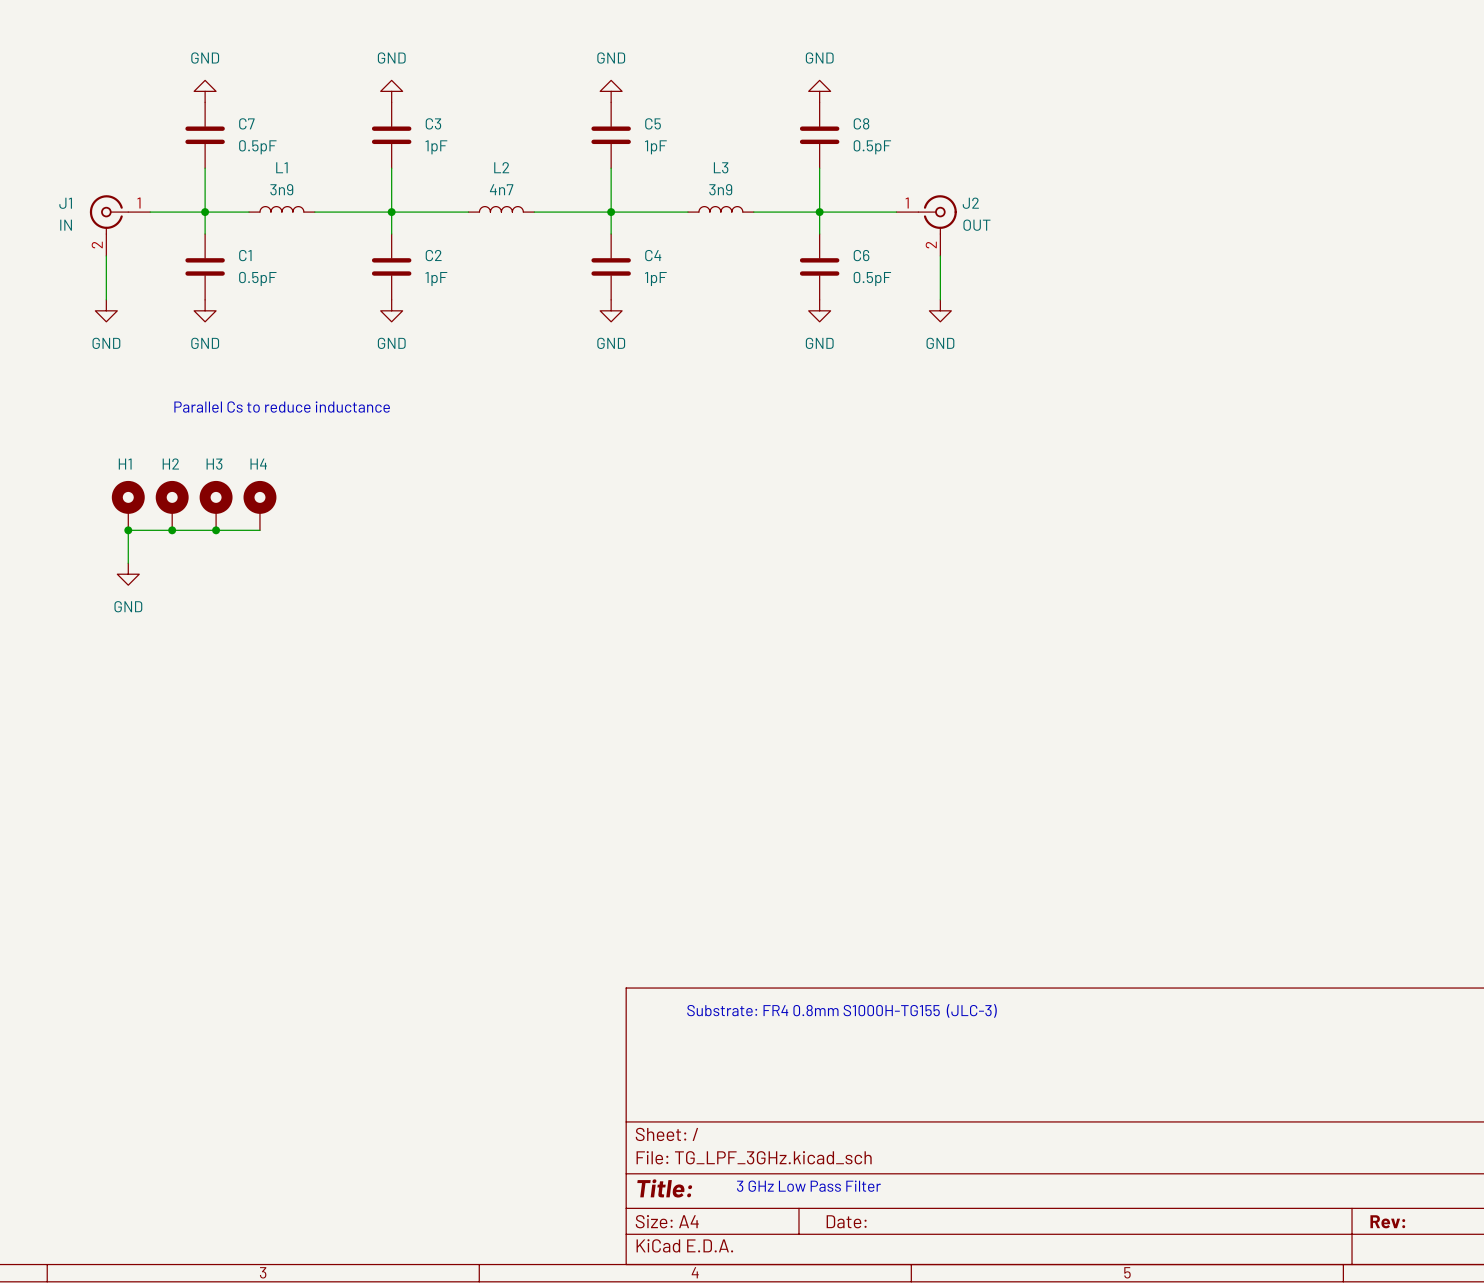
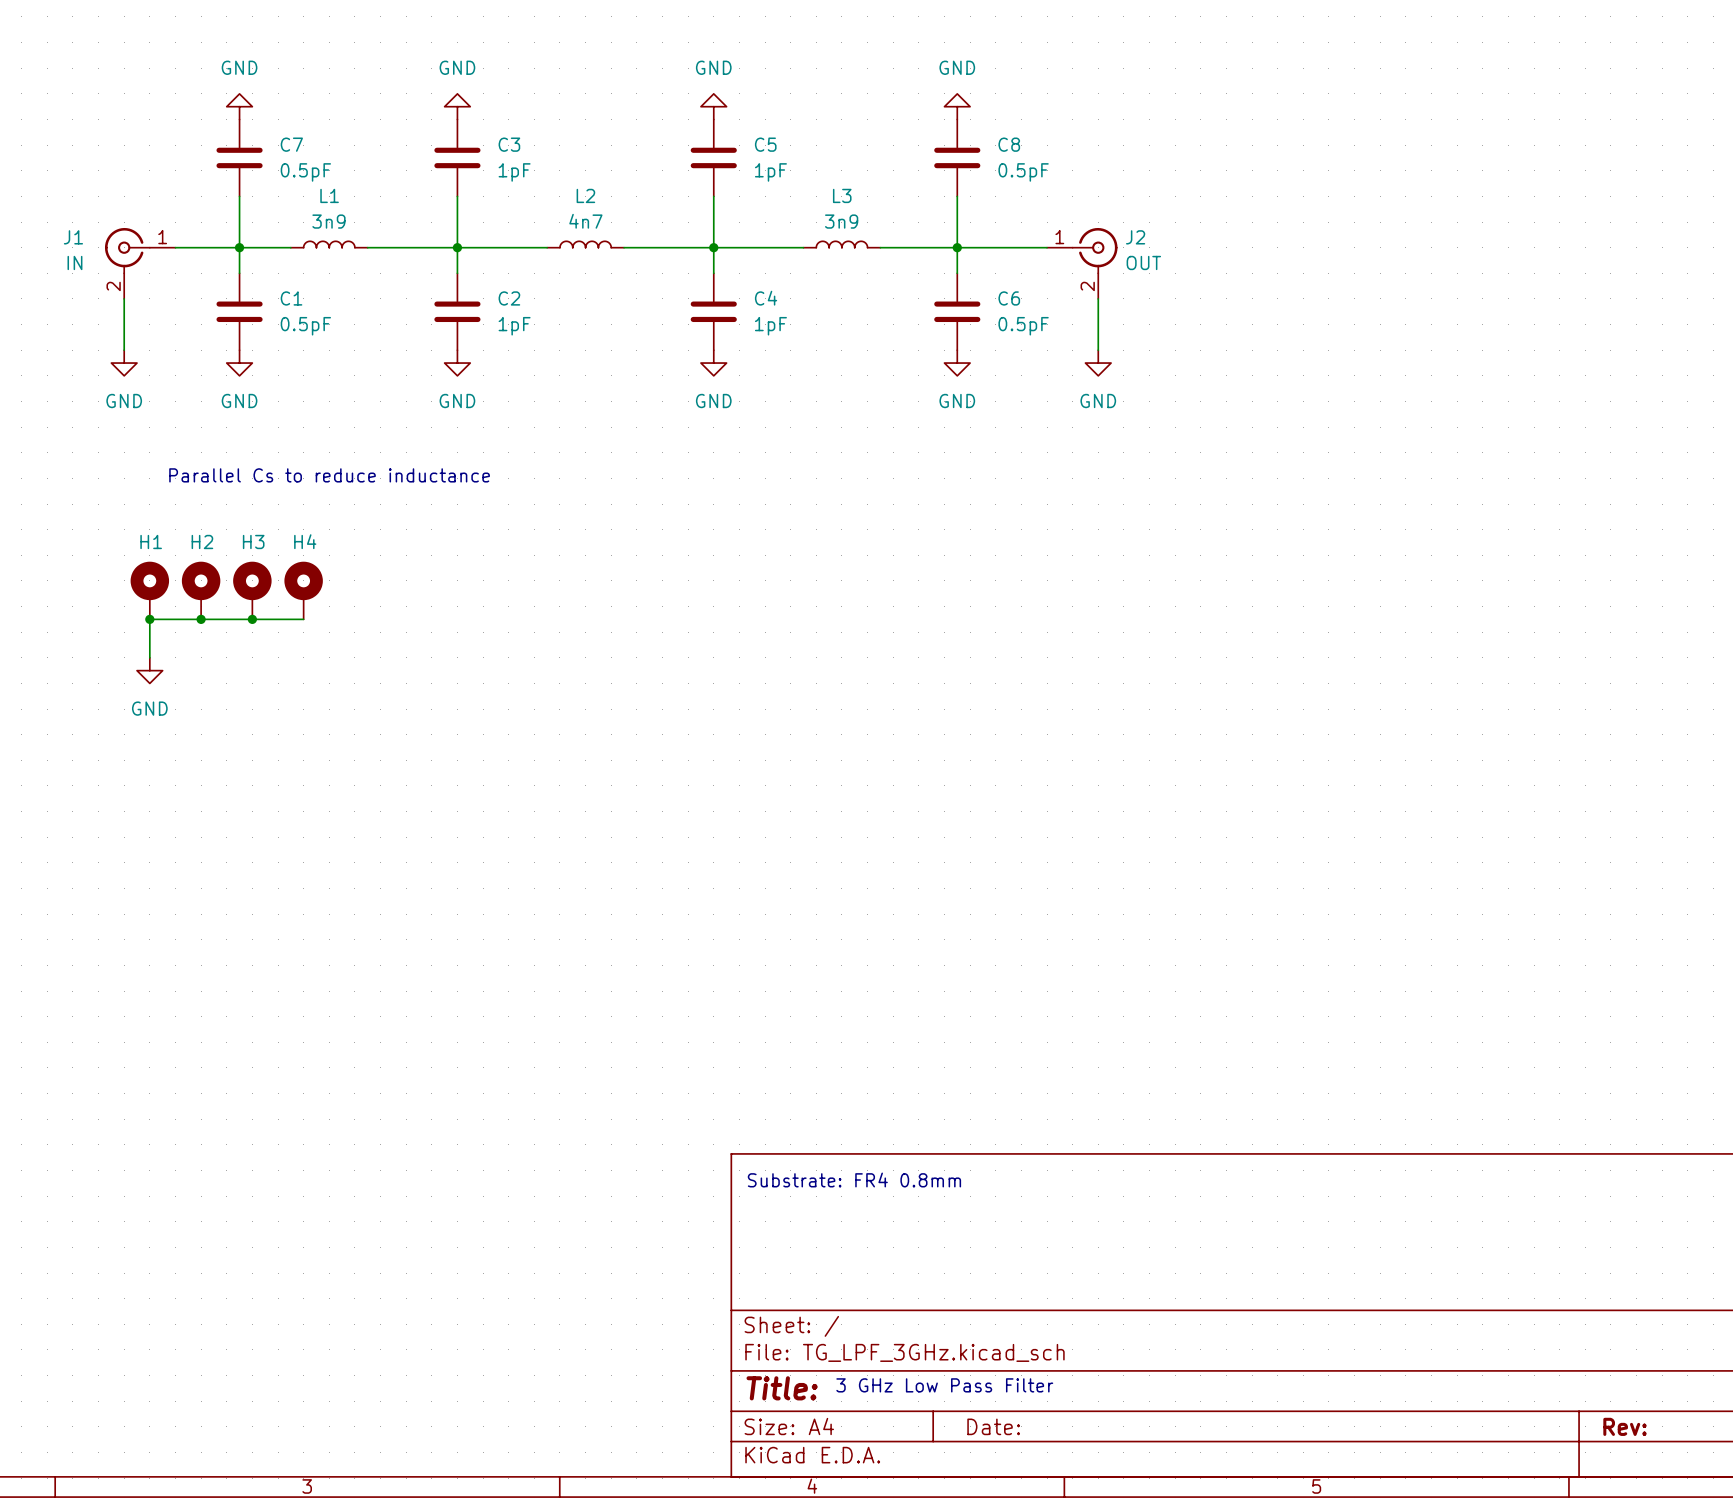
text: Substrate: FR4 0.8mm S1000H-TG155 (JLC-3) (842, 1010) -> Substrate: FR4 0.8mm (854, 1180)

